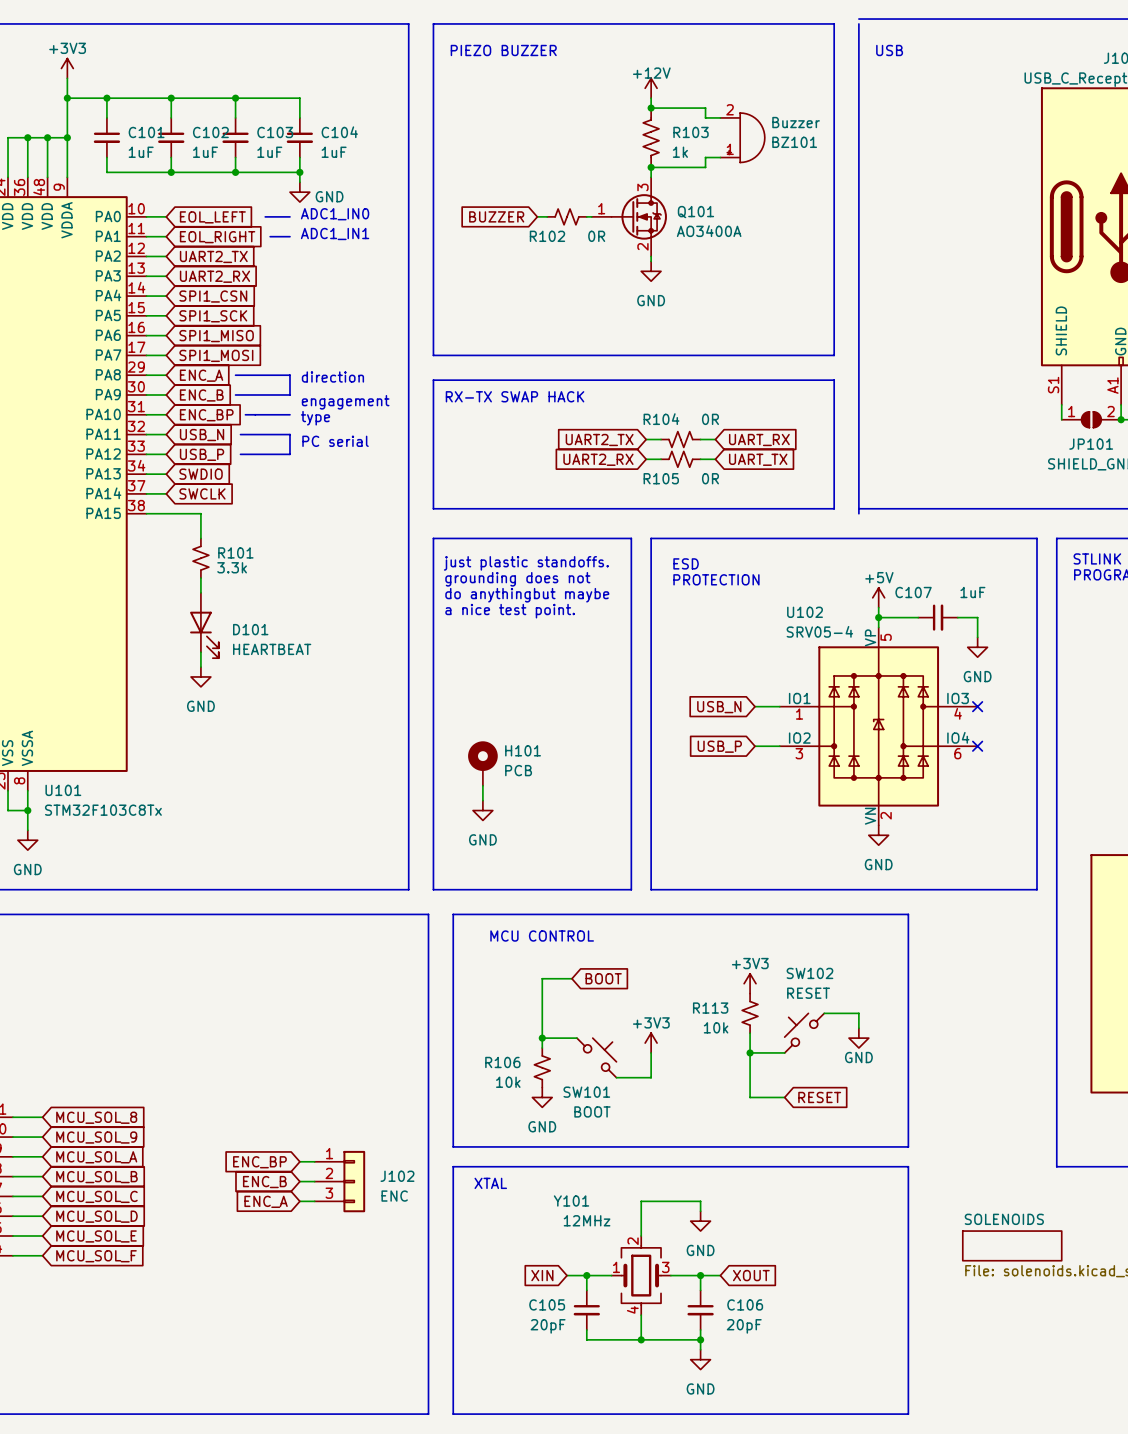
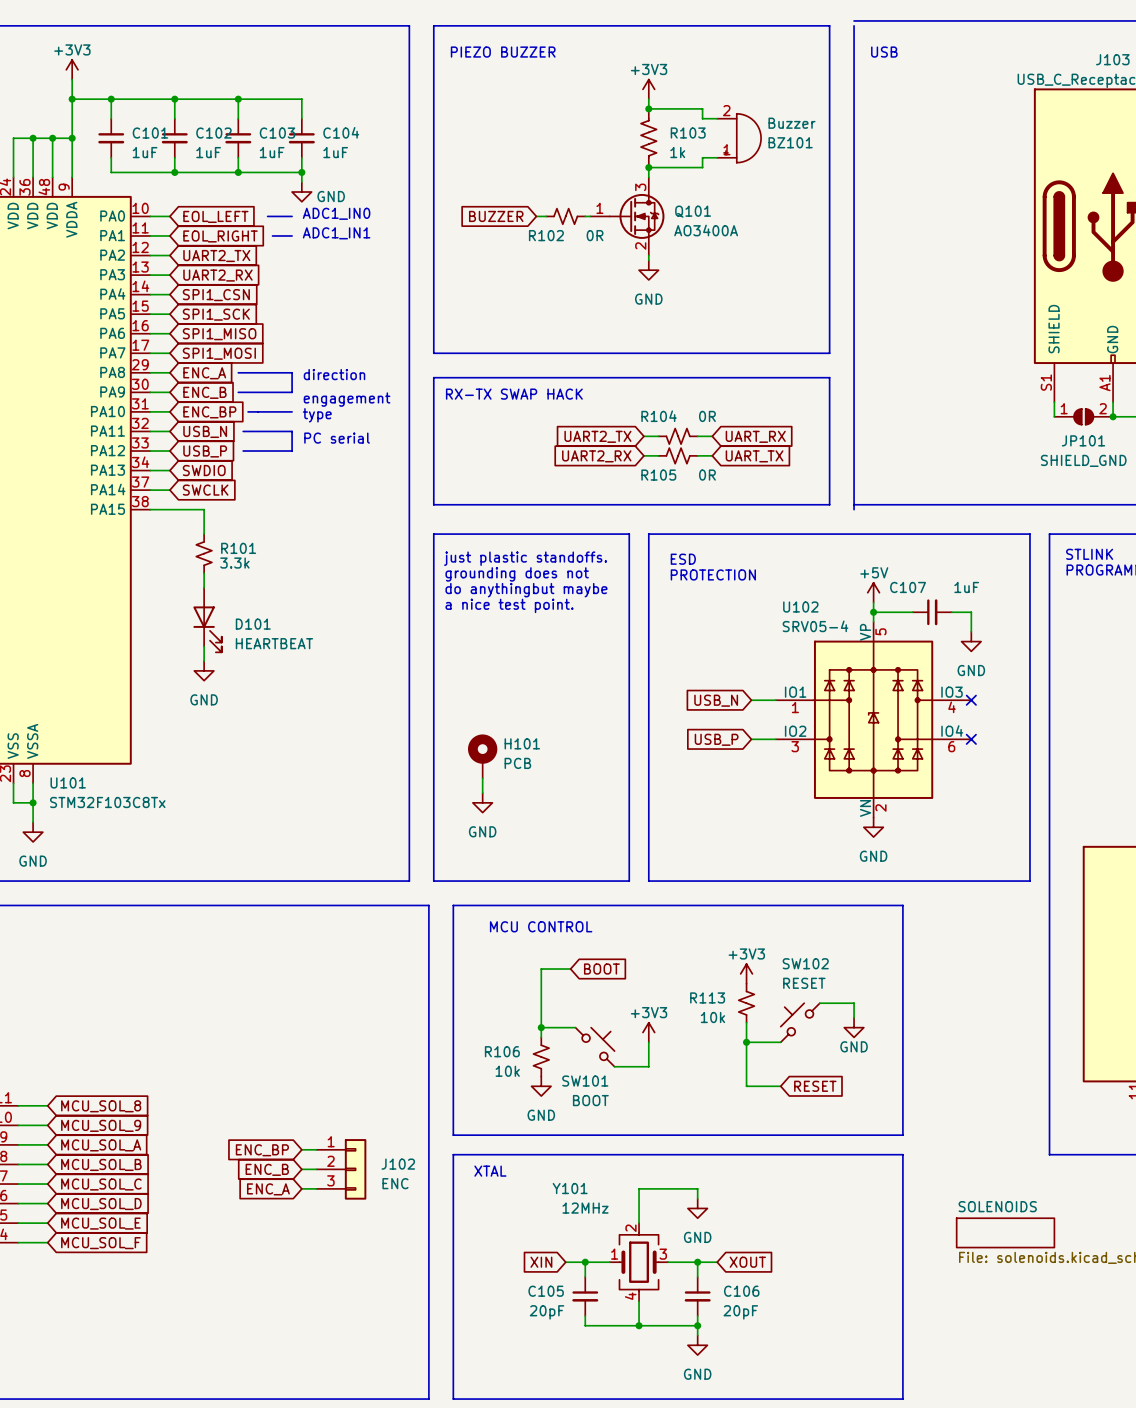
power symbol: +12V (651, 88) -> +3V3 (648, 89)

